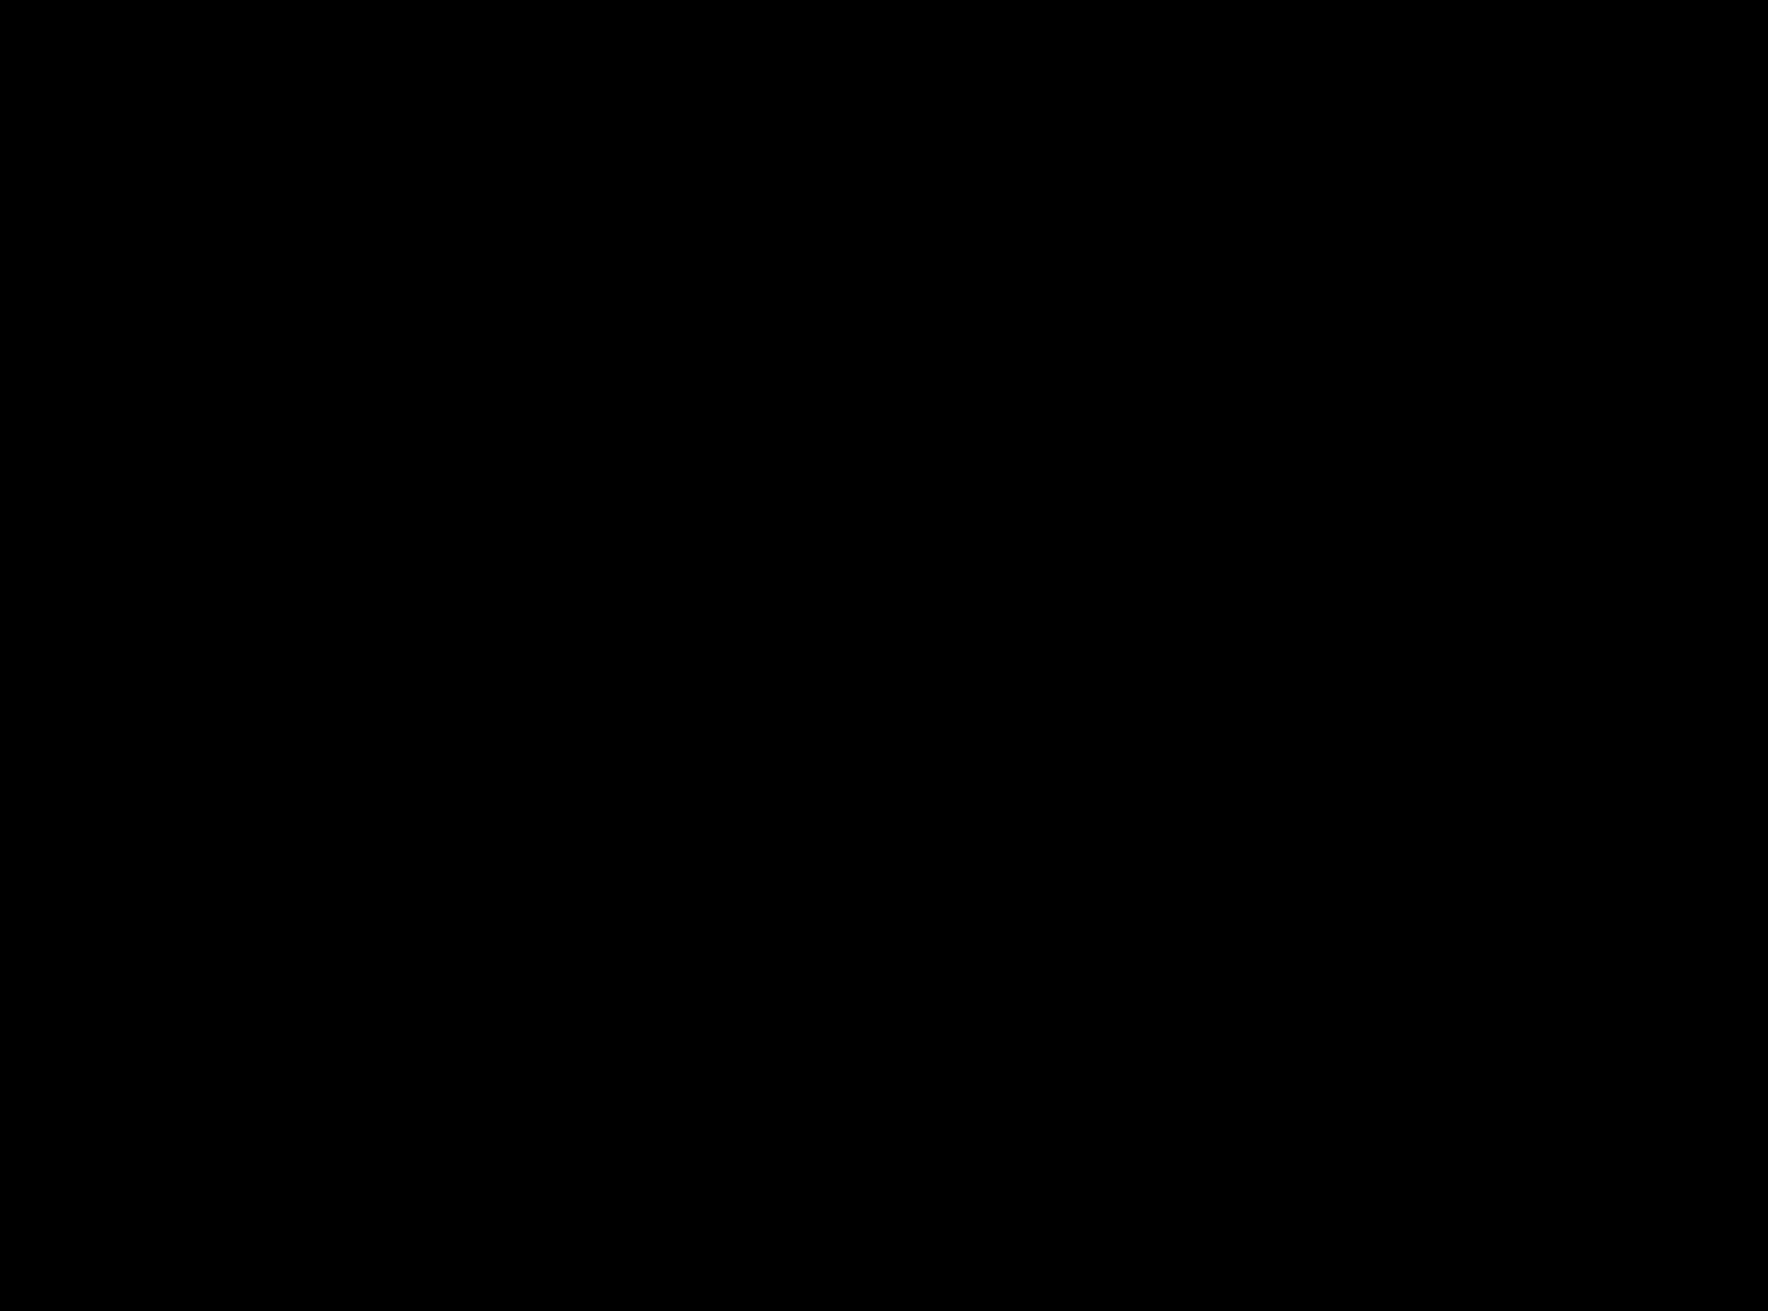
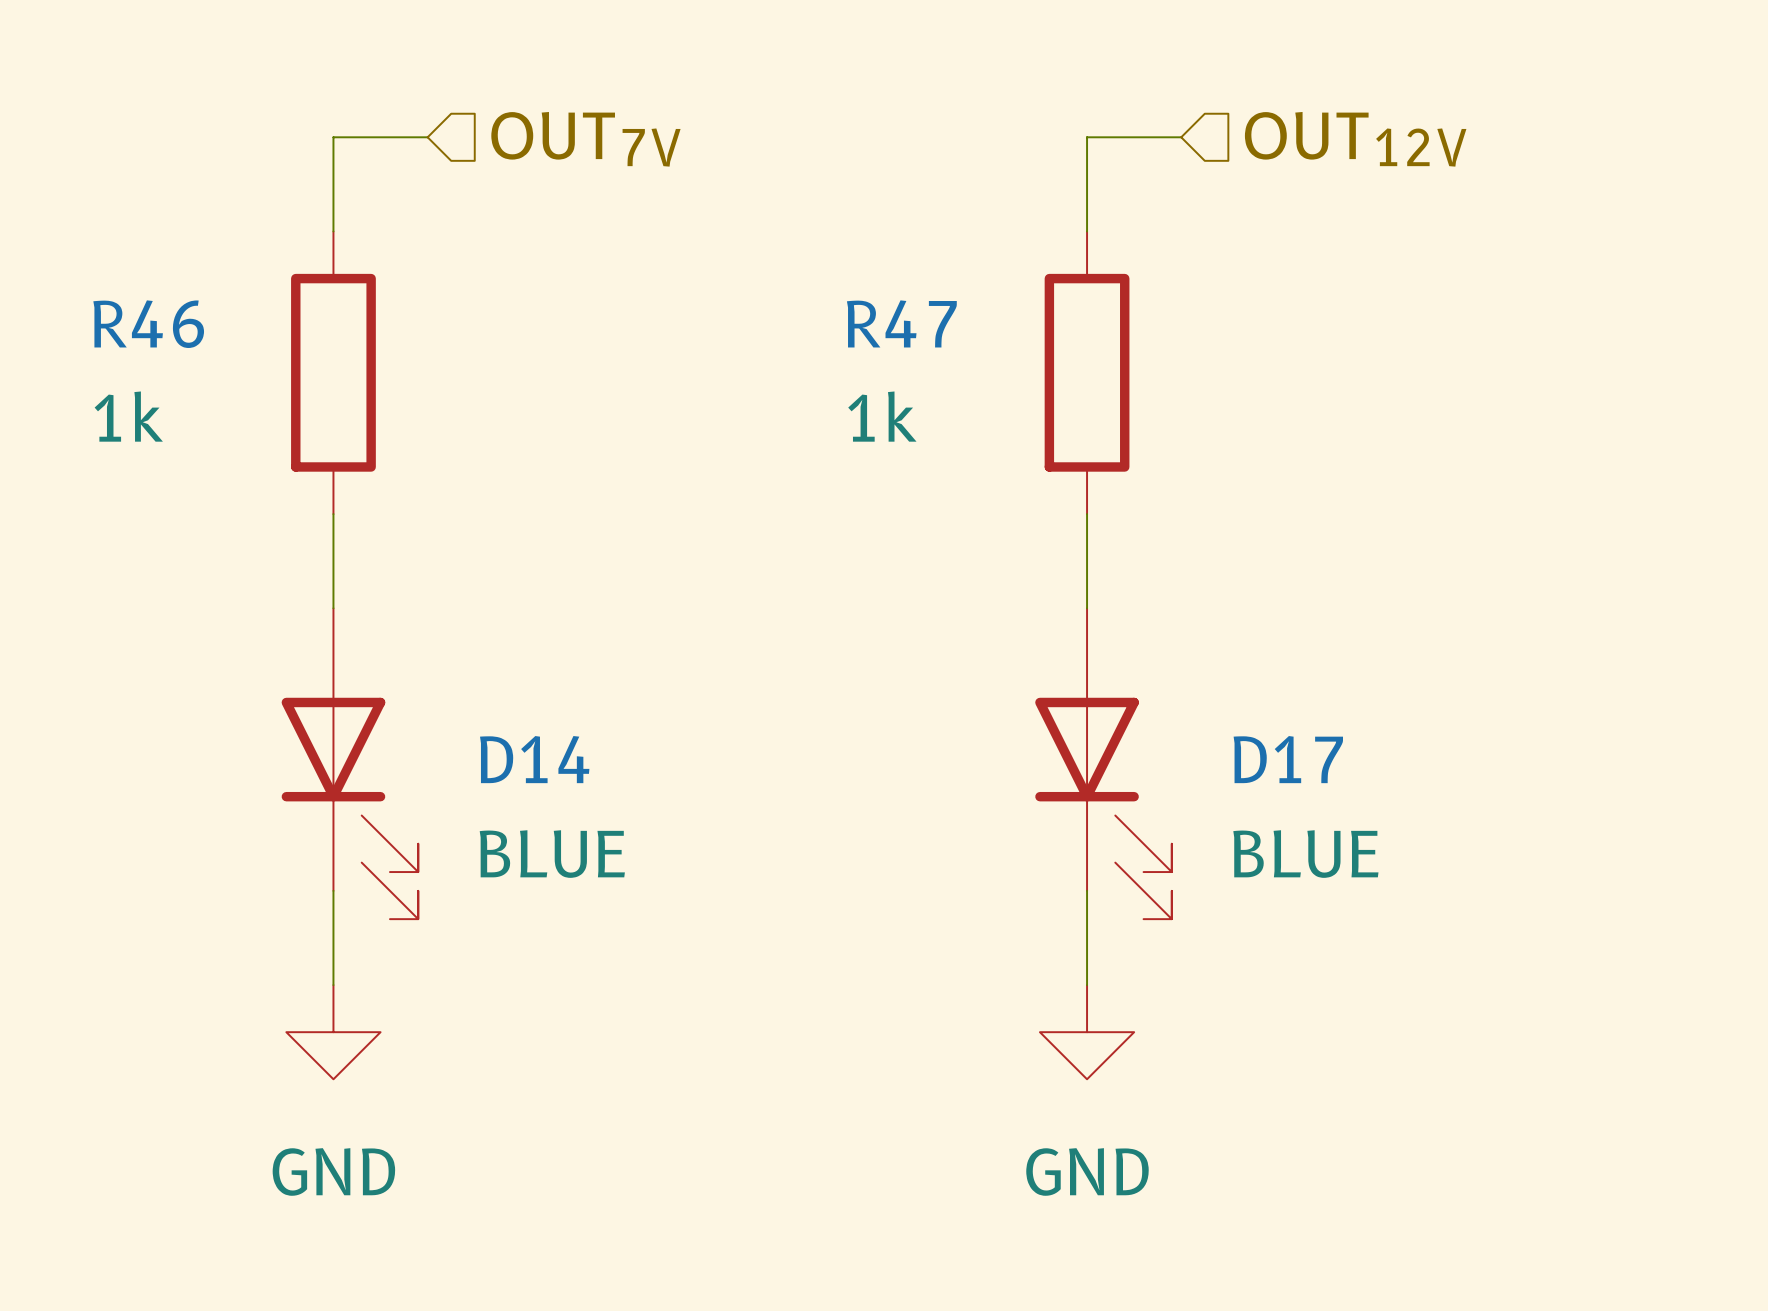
wire: none -> (427, 137) (333, 137) (333, 231)
wire: none -> (1181, 137) (1087, 137) (1087, 231)
hierarchical label: none -> OUT7V (585, 139)
hierarchical label: none -> OUT12V (1355, 139)
R46: none -> 1k (333, 372)
R47: none -> 1k (1087, 372)
wire: none -> (333, 514) (333, 608)
wire: none -> (1087, 514) (1087, 608)
D14: none -> BLUE (349, 763)
D17: none -> BLUE (1103, 763)
wire: none -> (333, 890) (333, 985)
wire: none -> (1087, 890) (1087, 985)
power symbol: none -> GND (333, 1032)
power symbol: none -> GND (1087, 1032)

